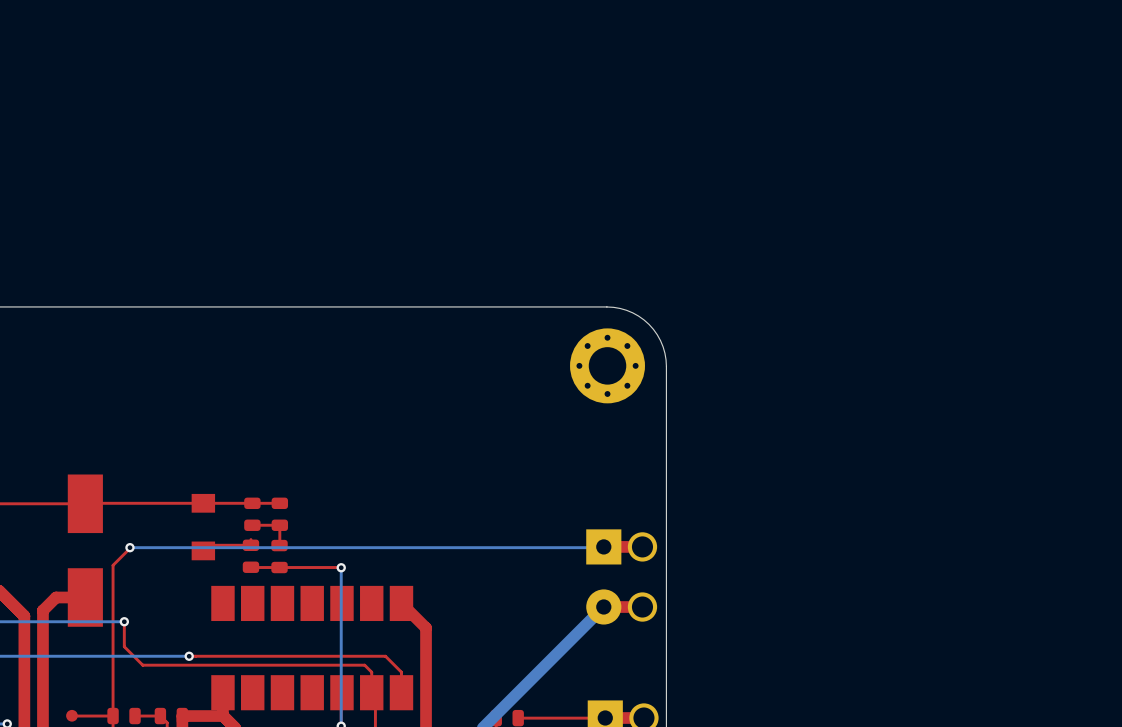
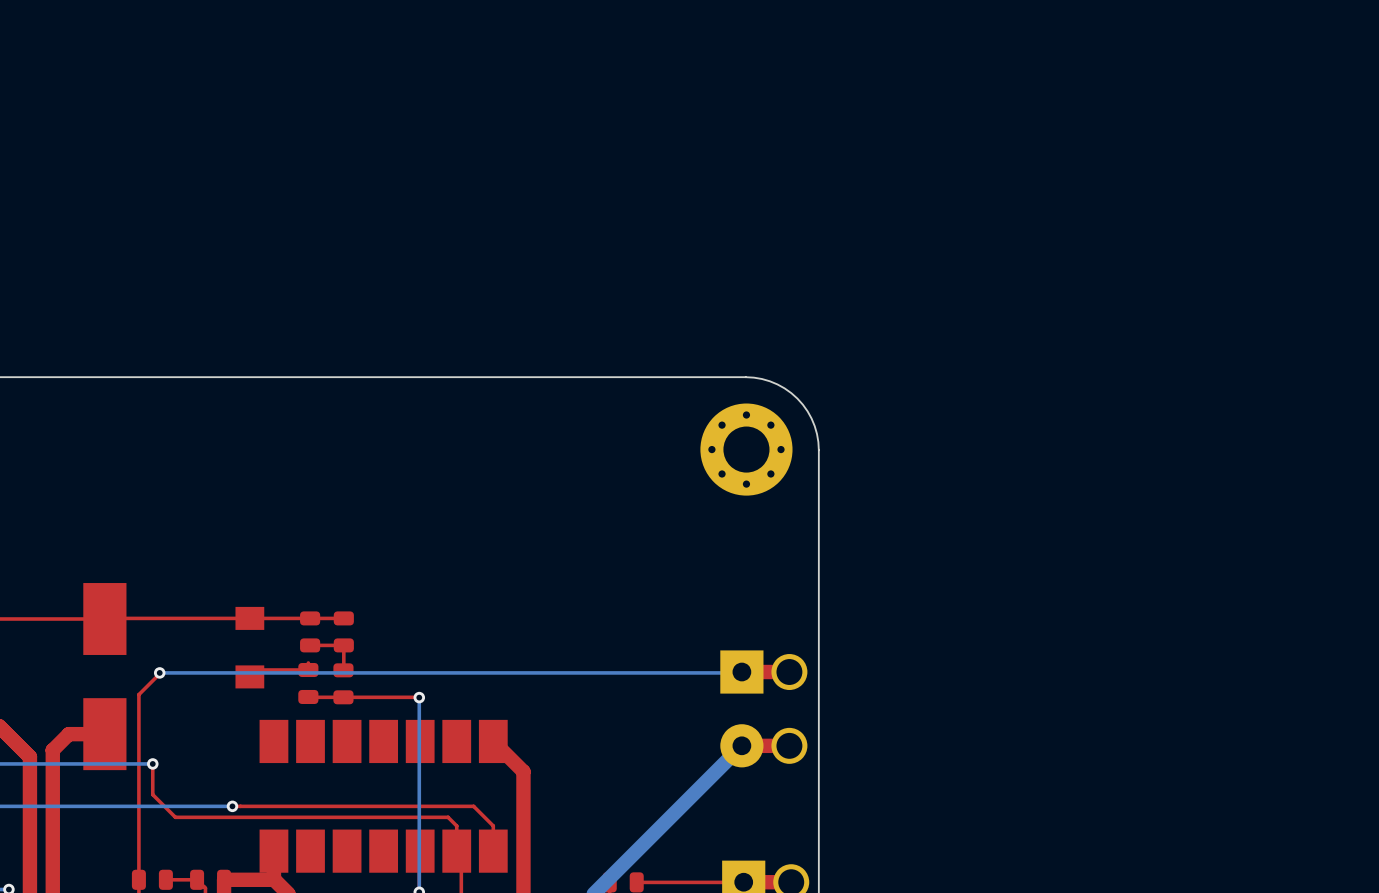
top track: (71, 715) (113, 716) -> none
part: (71, 715) -> none

